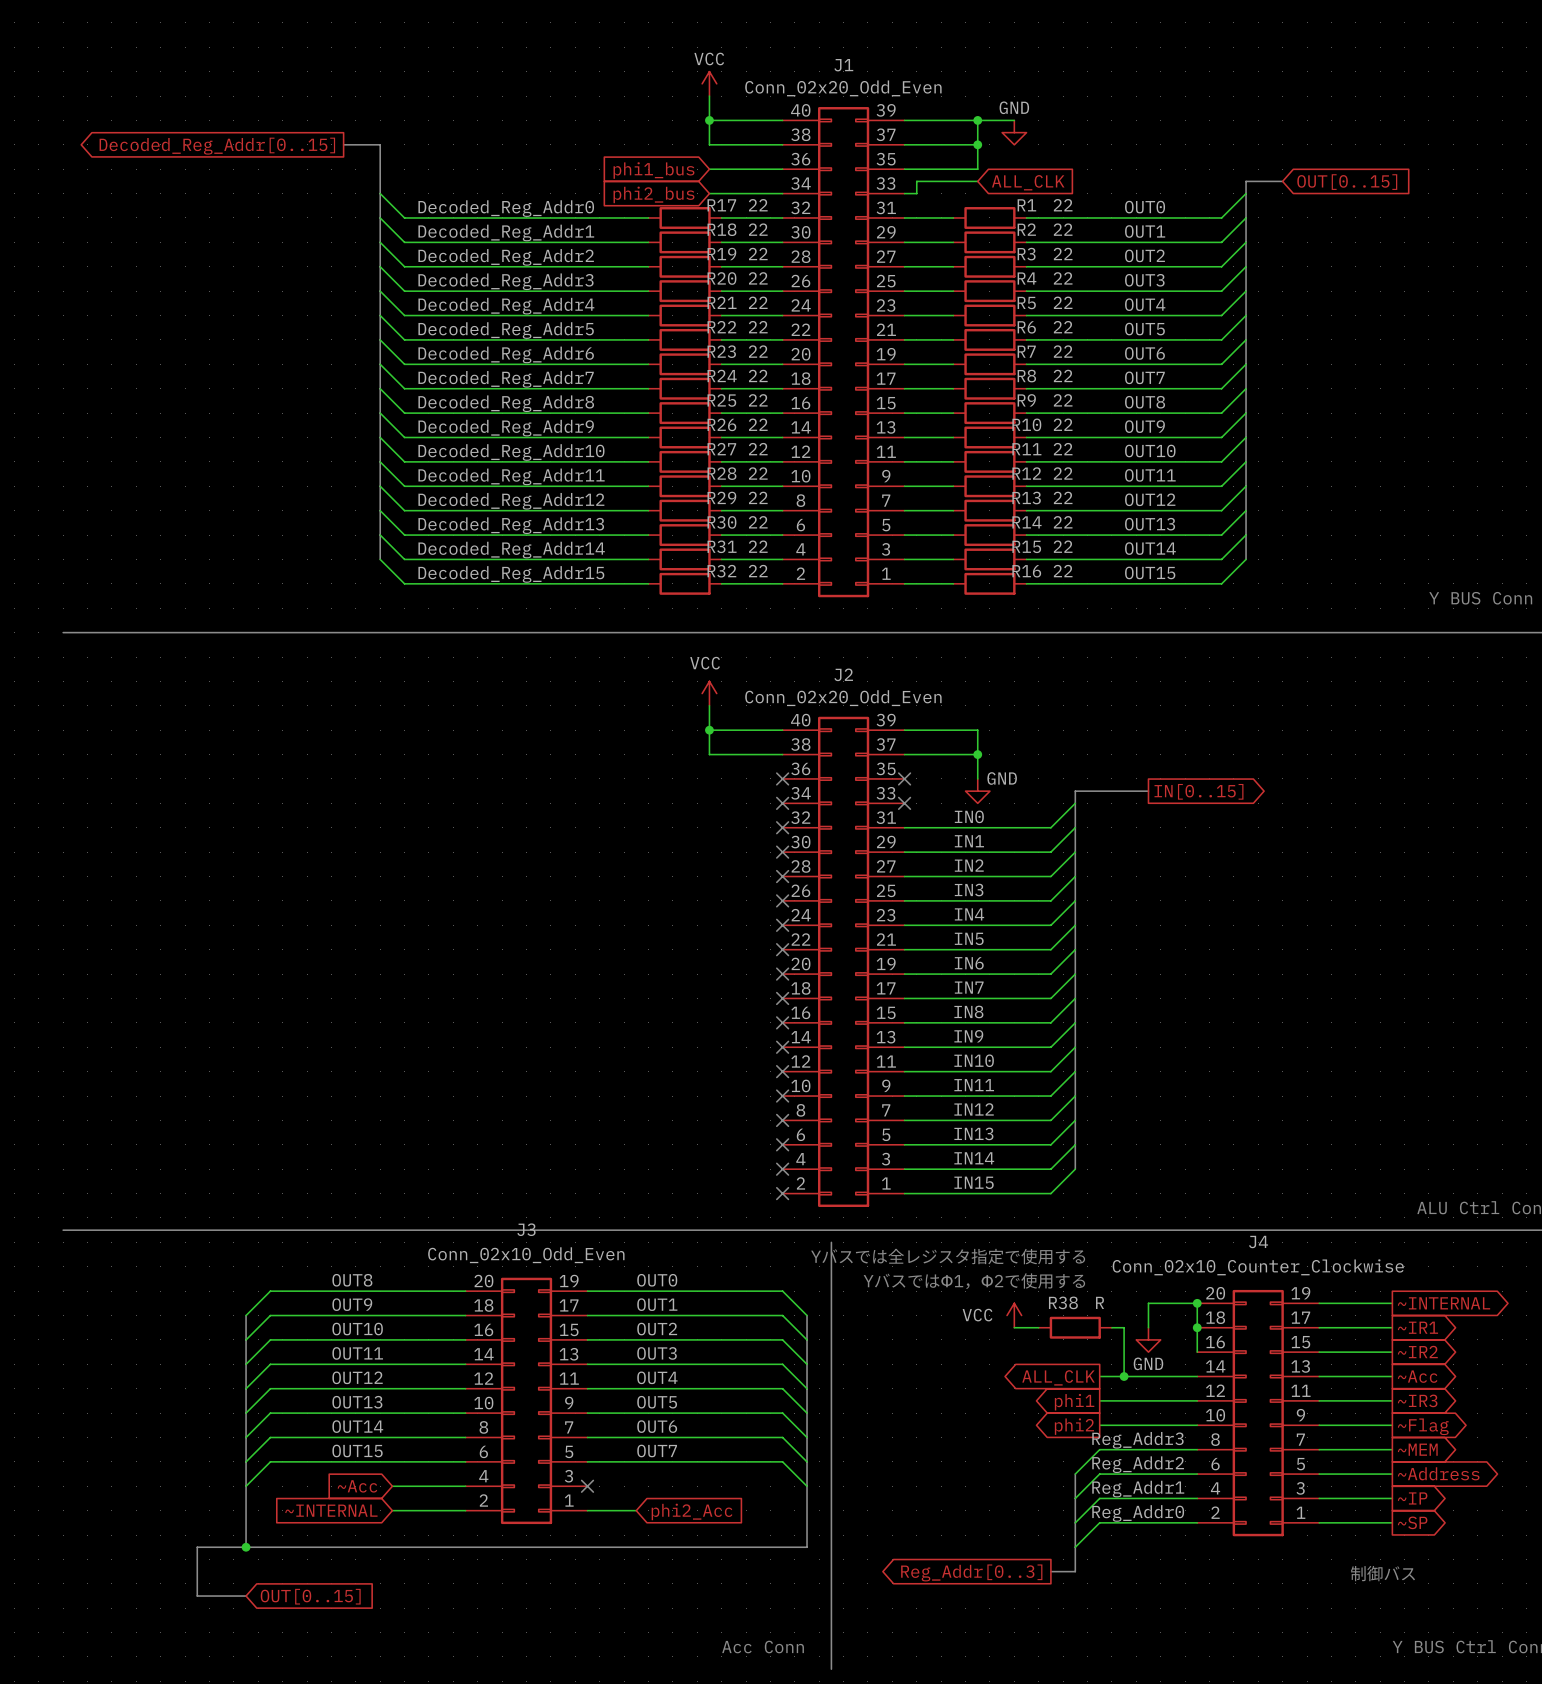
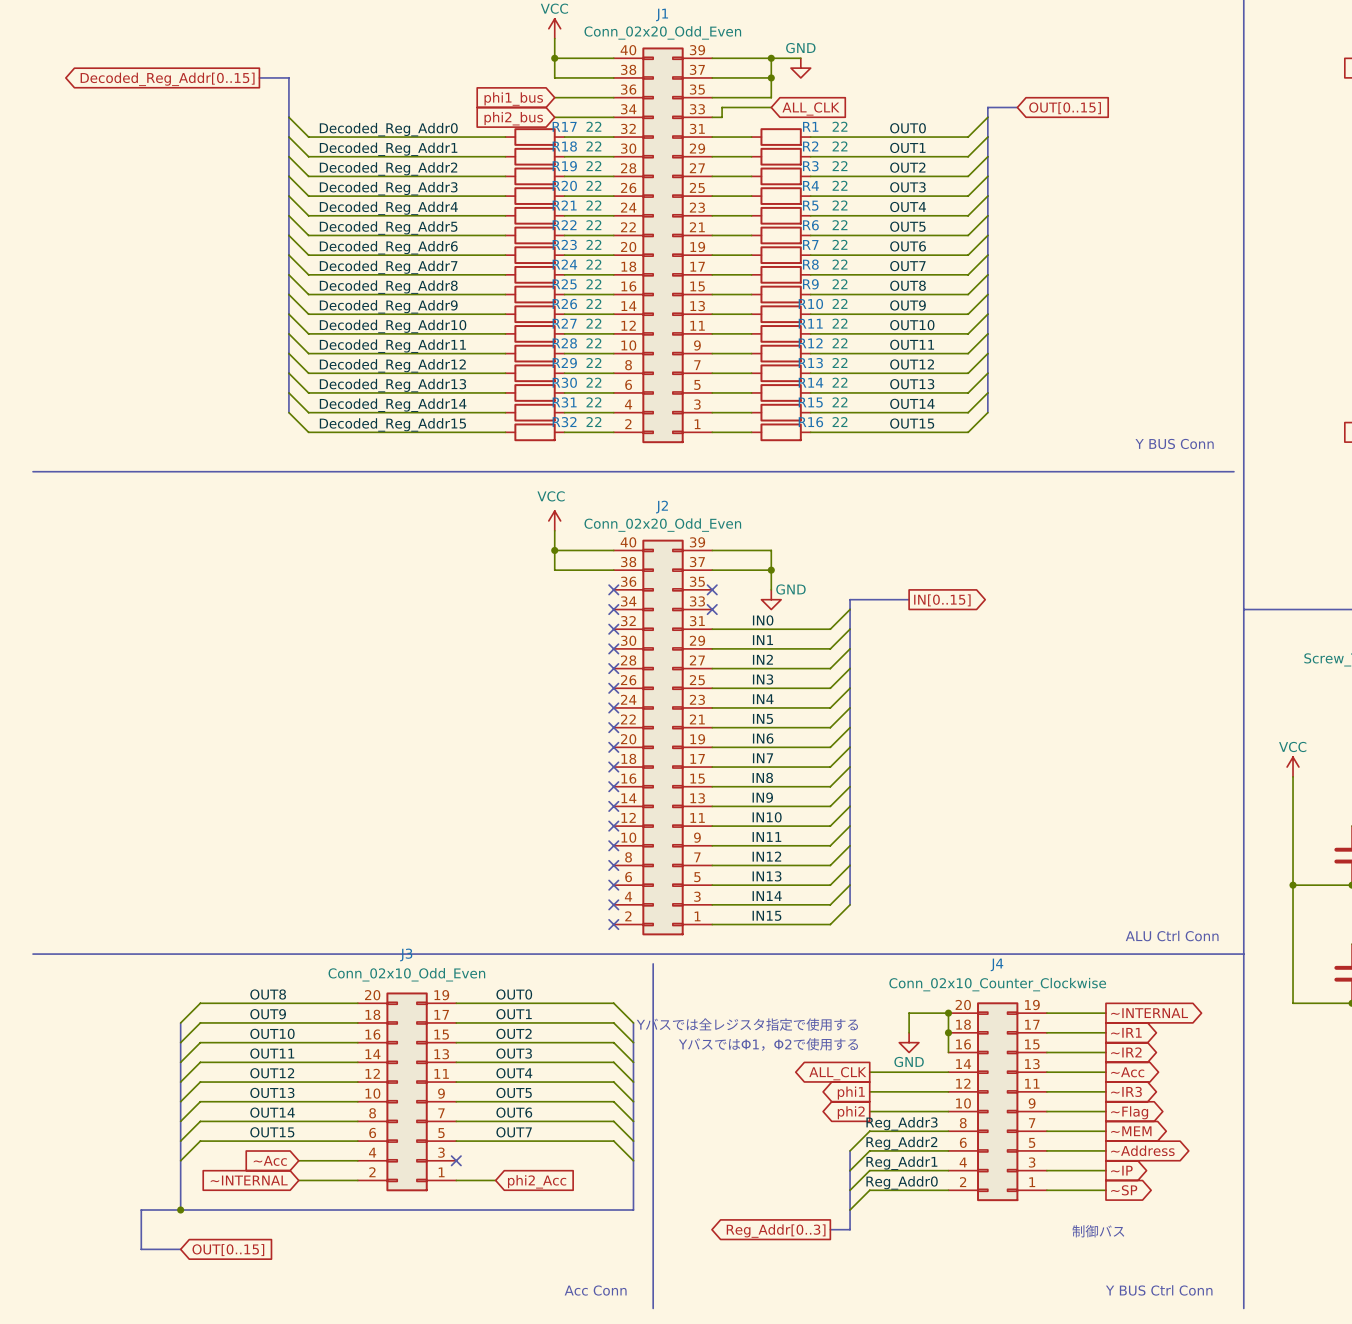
text position: Yバスでは全レジスタ指定で使用する (948, 1256) -> Yバスでは全レジスタ指定で使用する (747, 1024)
text position: YバスではΦ1，Φ2で使用する (974, 1281) -> YバスではΦ1，Φ2で使用する (768, 1044)
power symbol: VCC (1014, 1315) -> none
wire: (1014, 1327) (1038, 1327) -> none
R38: R (1075, 1327) -> none
wire: (1111, 1327) (1124, 1327) (1124, 1376) -> none
junction: (1124, 1376) -> none

